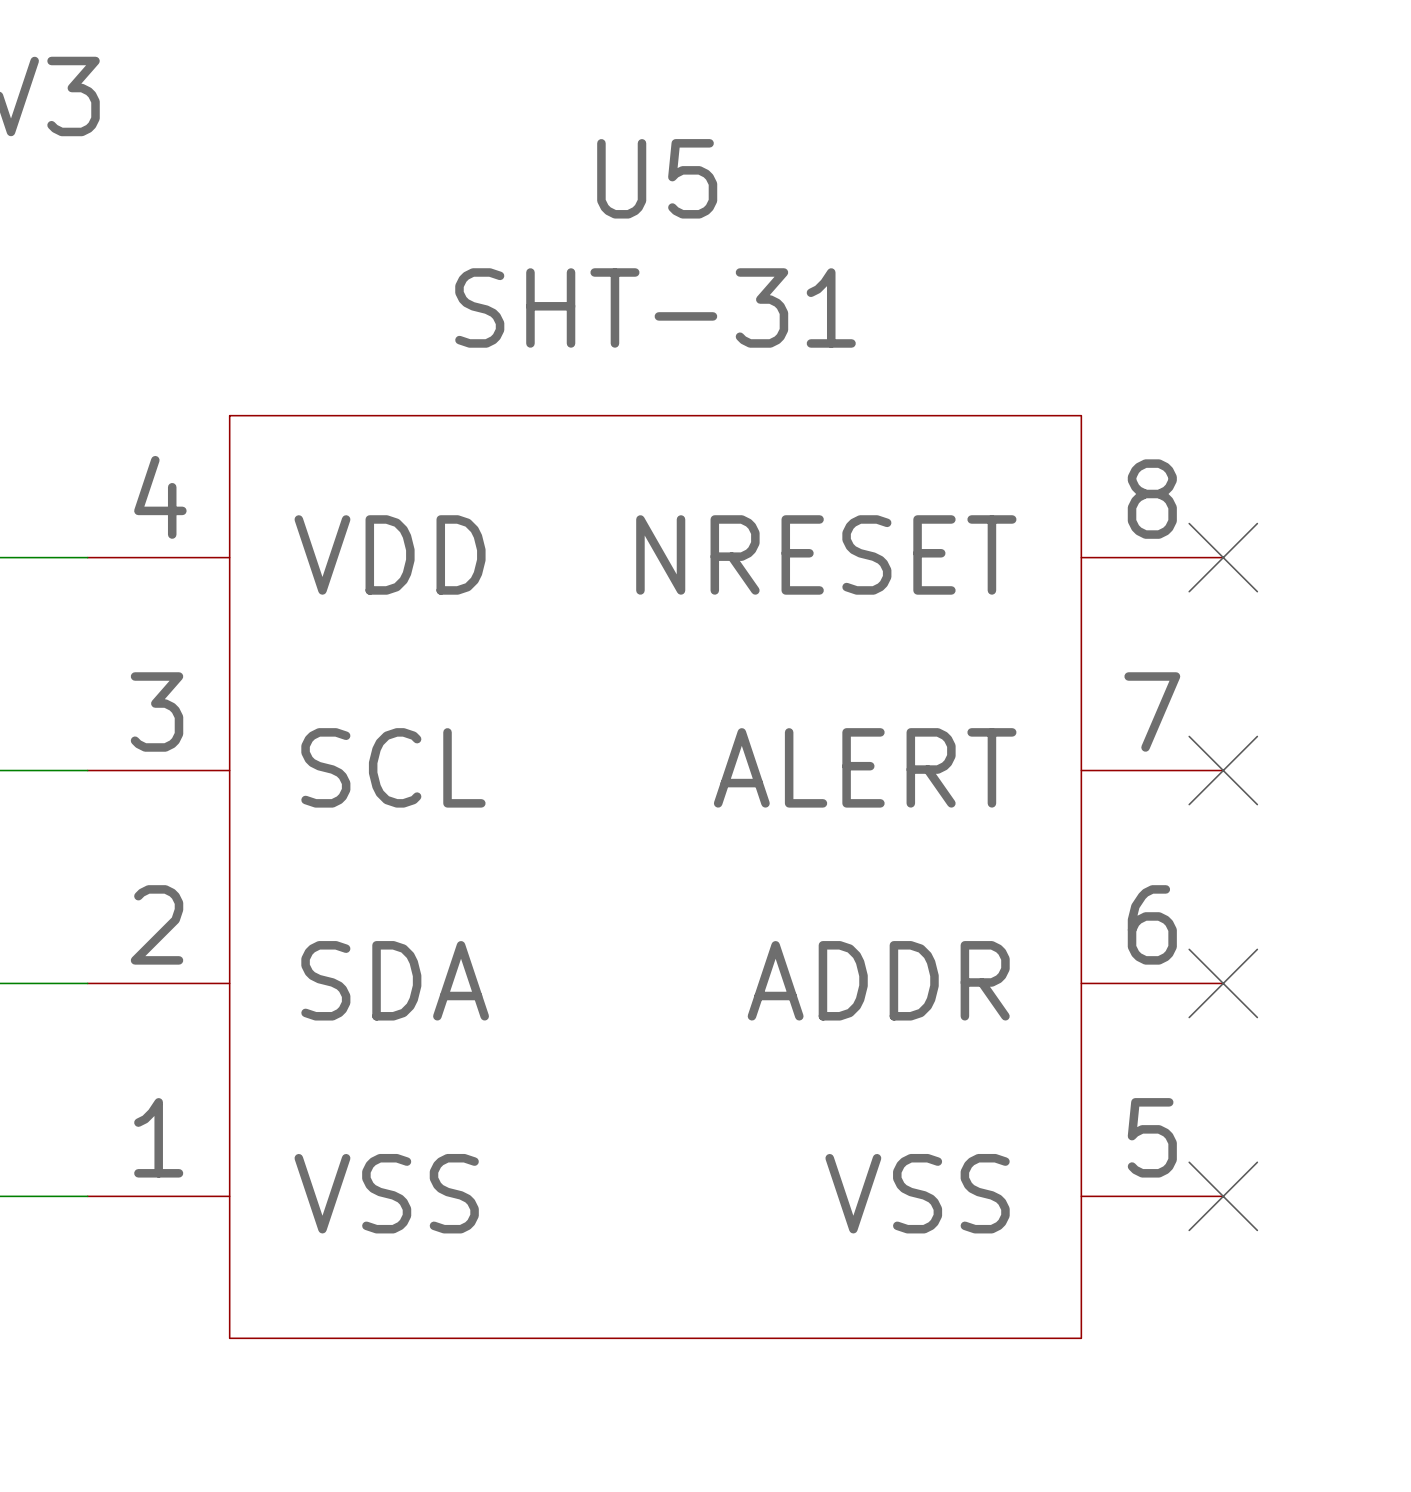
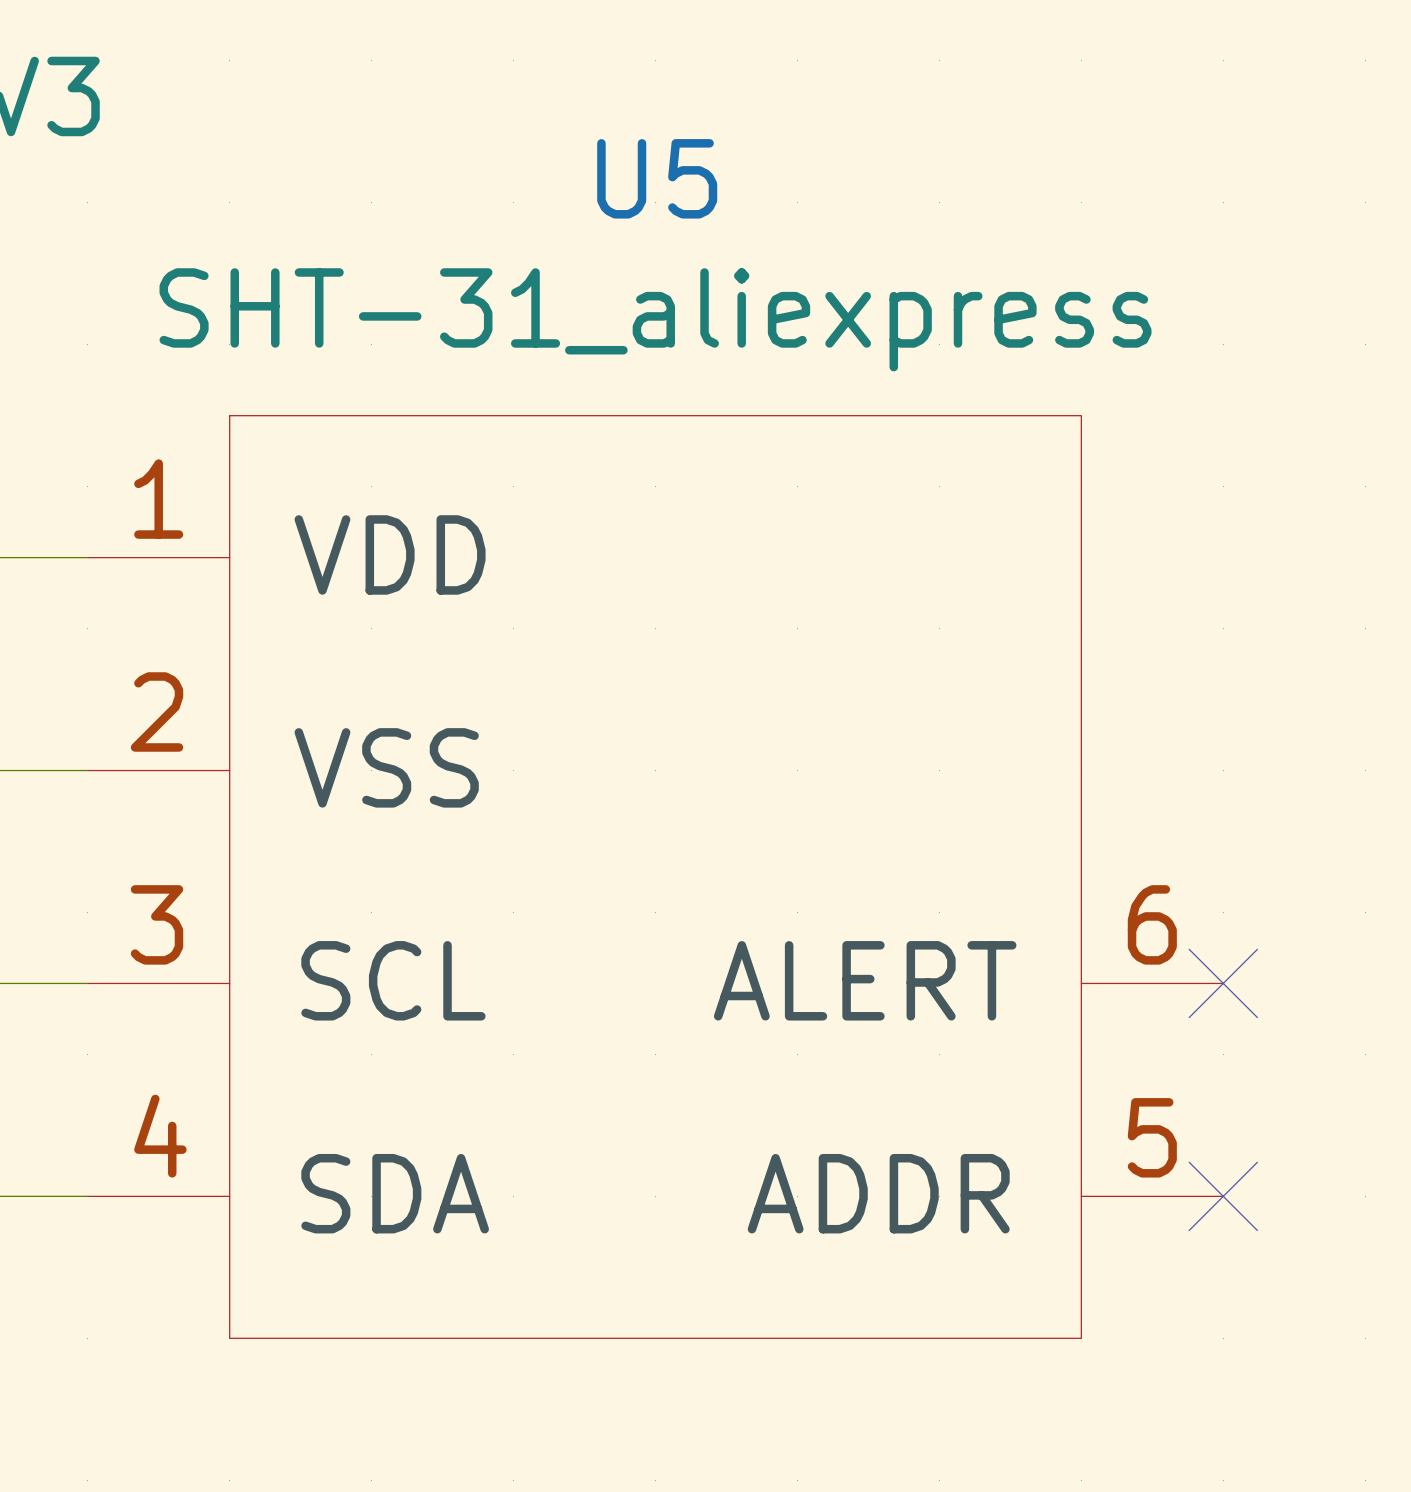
U5 value: SHT-31 (655, 307) -> SHT-31_aliexpress (655, 319)
U5 symbol: [87, 415, 1224, 1339] -> [87, 415, 1224, 1339]
no-connect mark: (1223, 557) -> none
no-connect mark: (1223, 770) -> none

